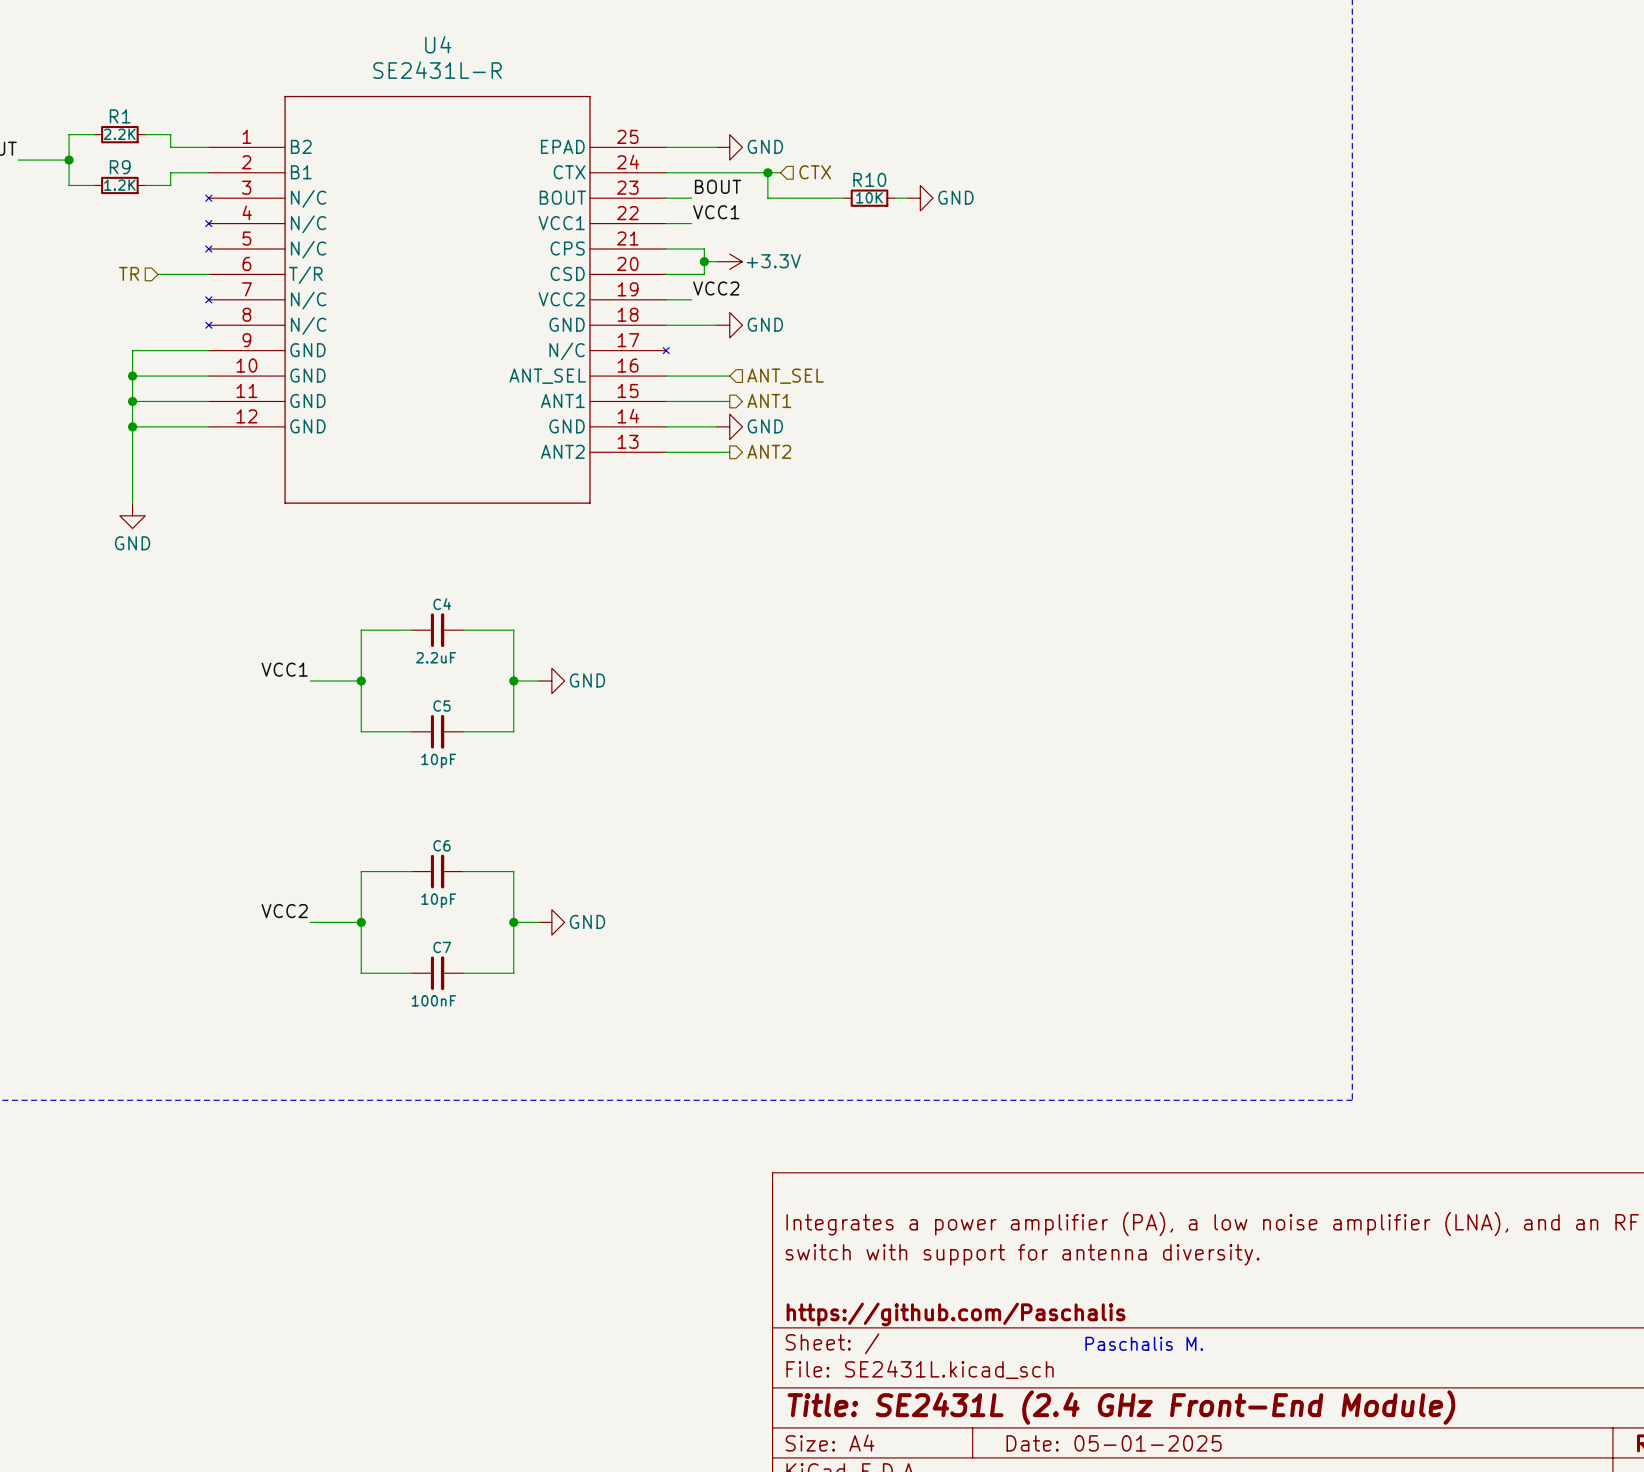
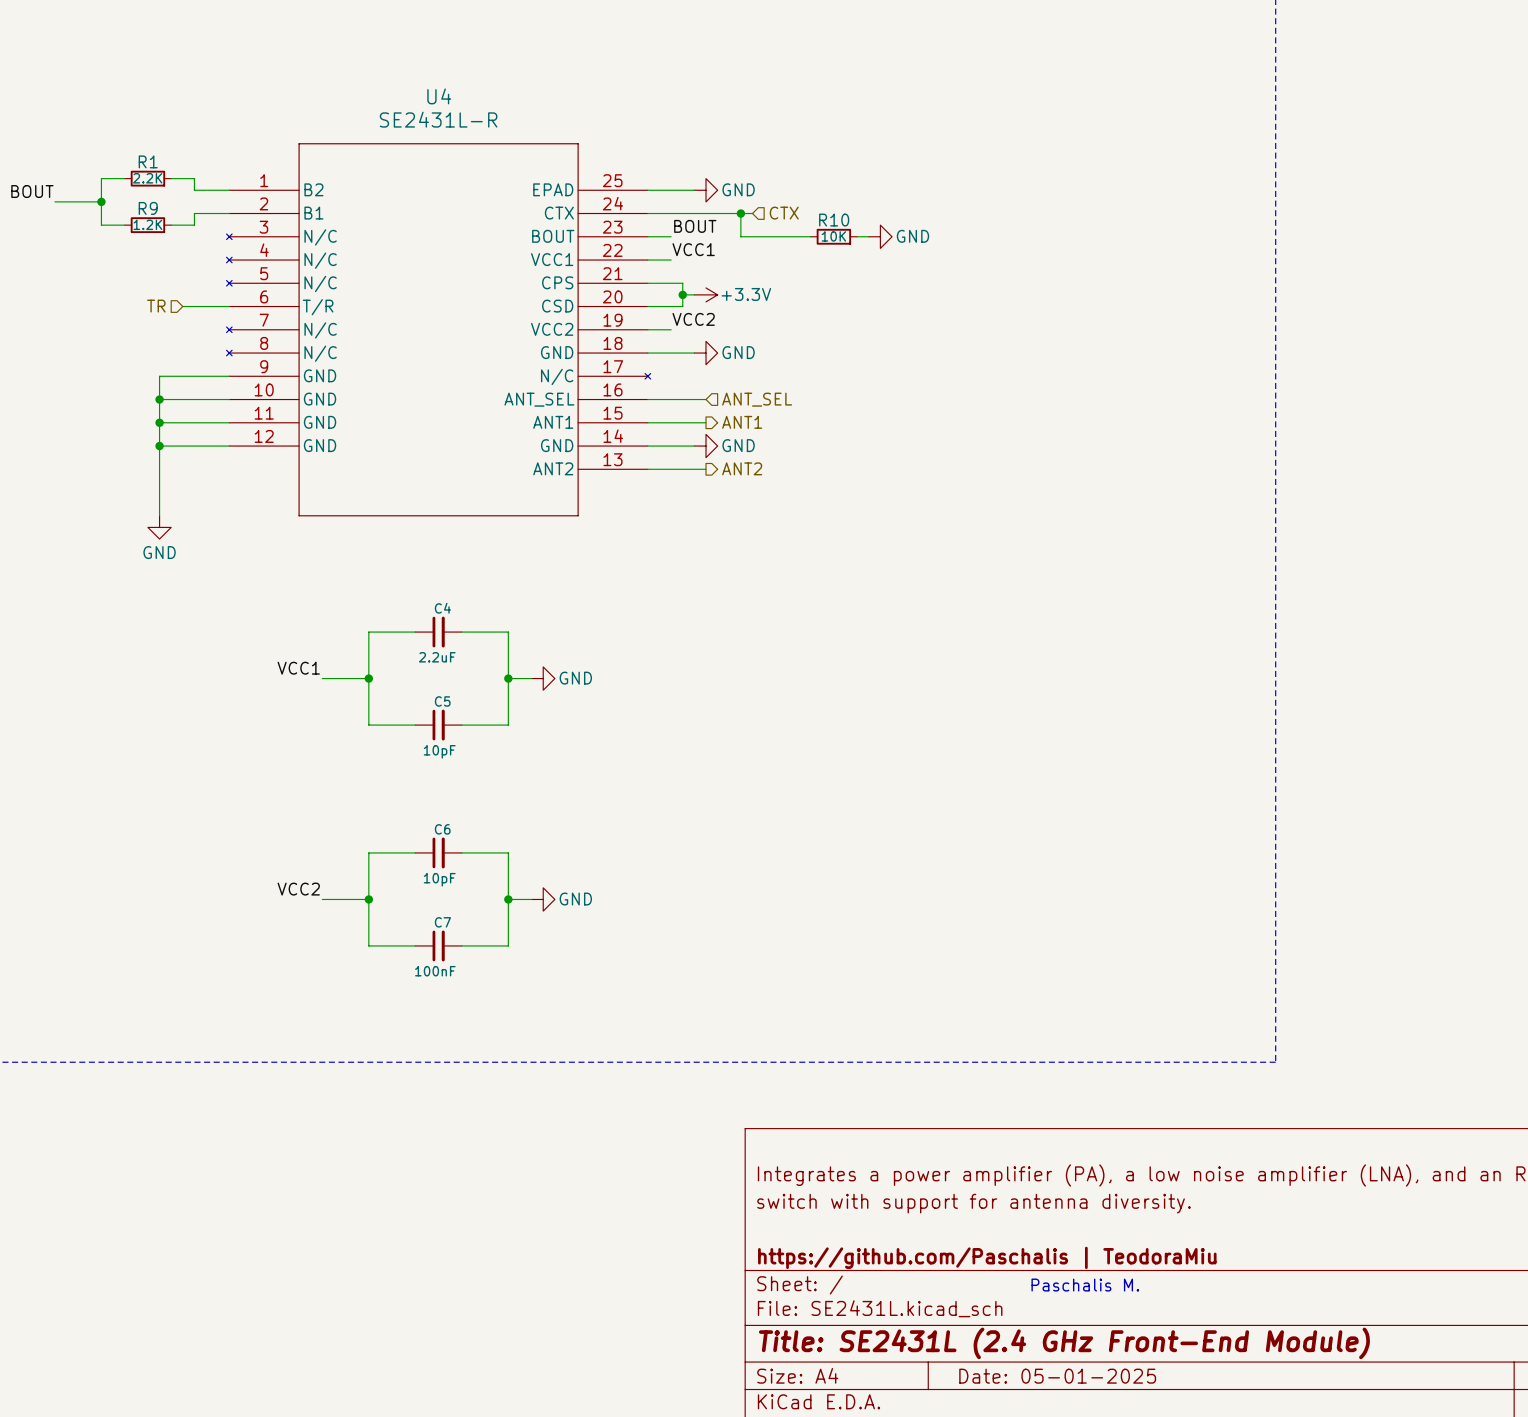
title block: https://github.com/Paschalis (956, 1314) -> https://github.com/Paschalis | TeodoraMiu (987, 1257)

